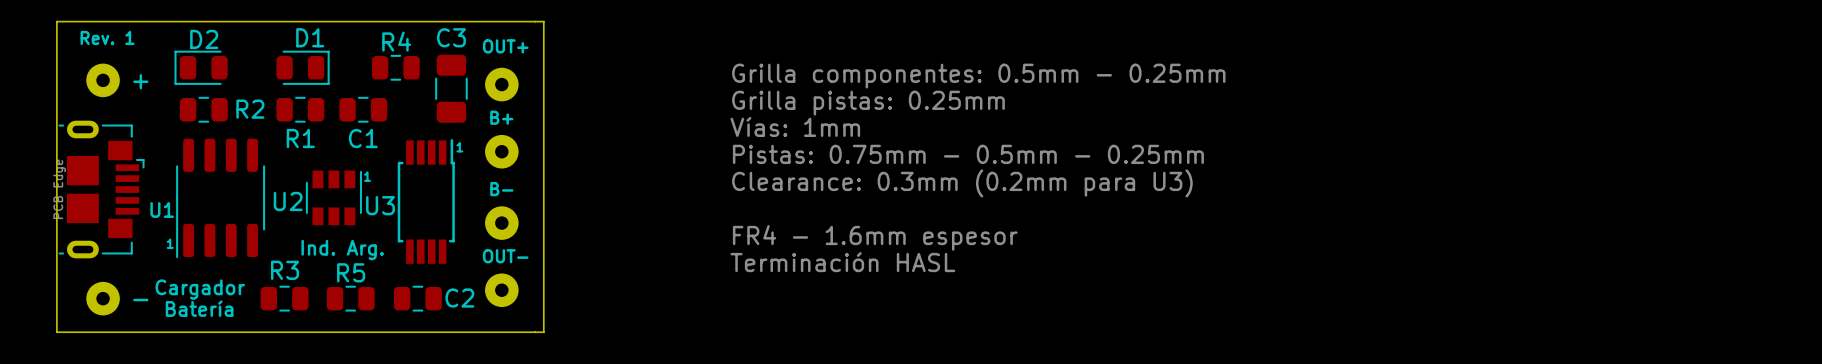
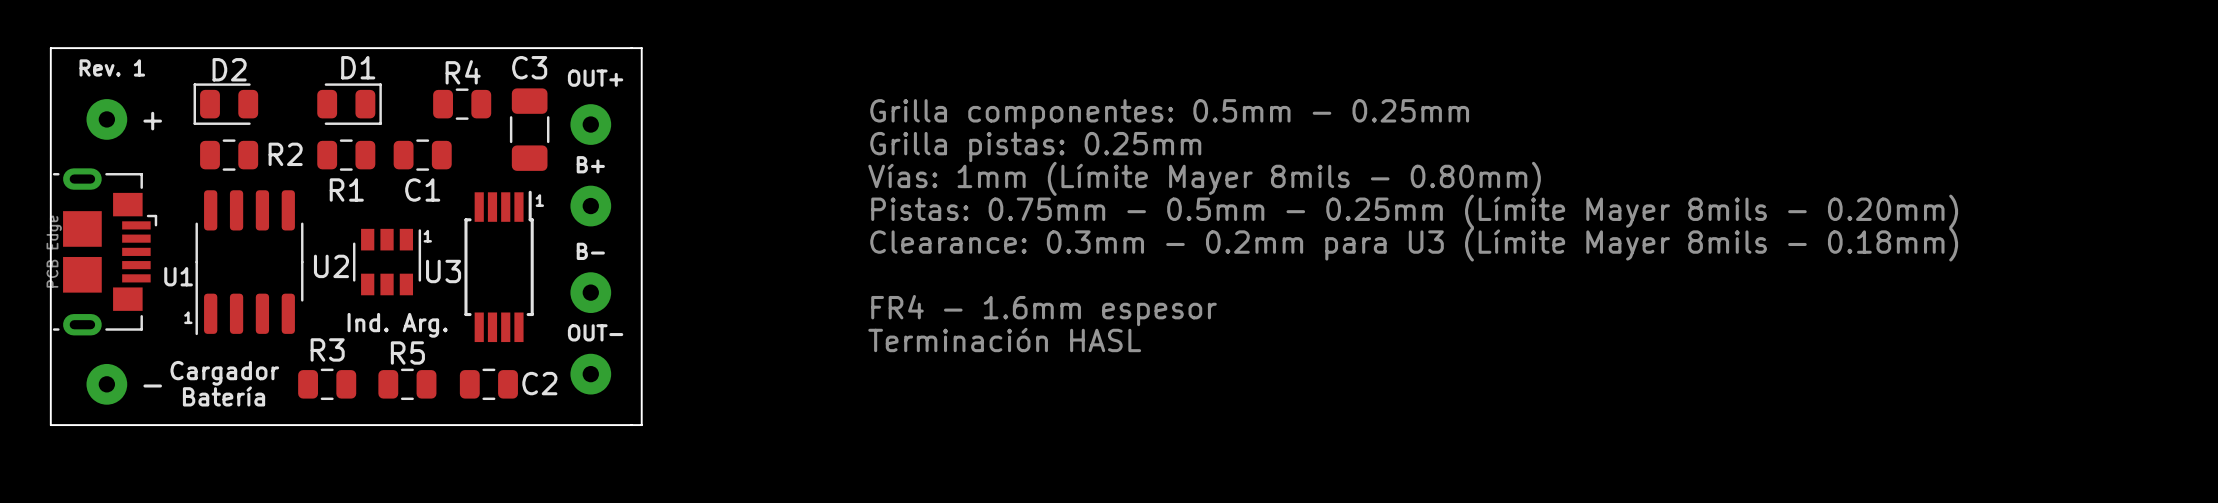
text: Vías: 1mm (795, 126) -> Vías: 1mm (Límite Mayer 8mils - 0.80mm) (1204, 178)
text: Pistas: 0.75mm - 0.5mm - 0.25mm (968, 154) -> Pistas: 0.75mm - 0.5mm - 0.25mm (Límite Mayer 8mils - 0.20mm) (1414, 211)
text: Clearance: 0.3mm (0.2mm para U3) (962, 183) -> Clearance: 0.3mm - 0.2mm para U3 (Límite Mayer 8mils - 0.18mm) (1414, 244)

